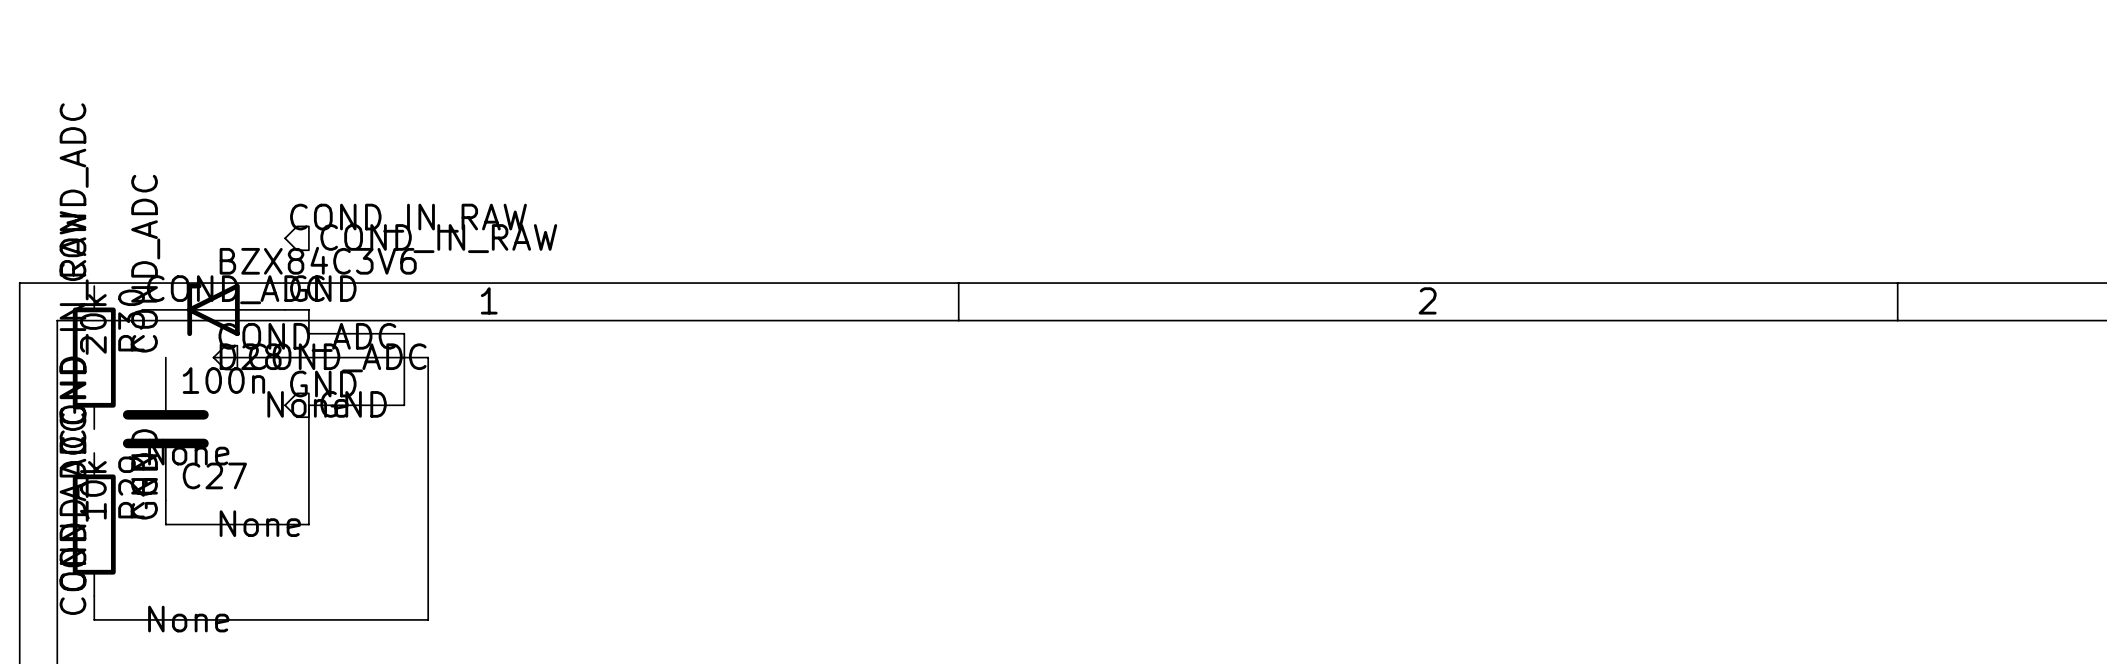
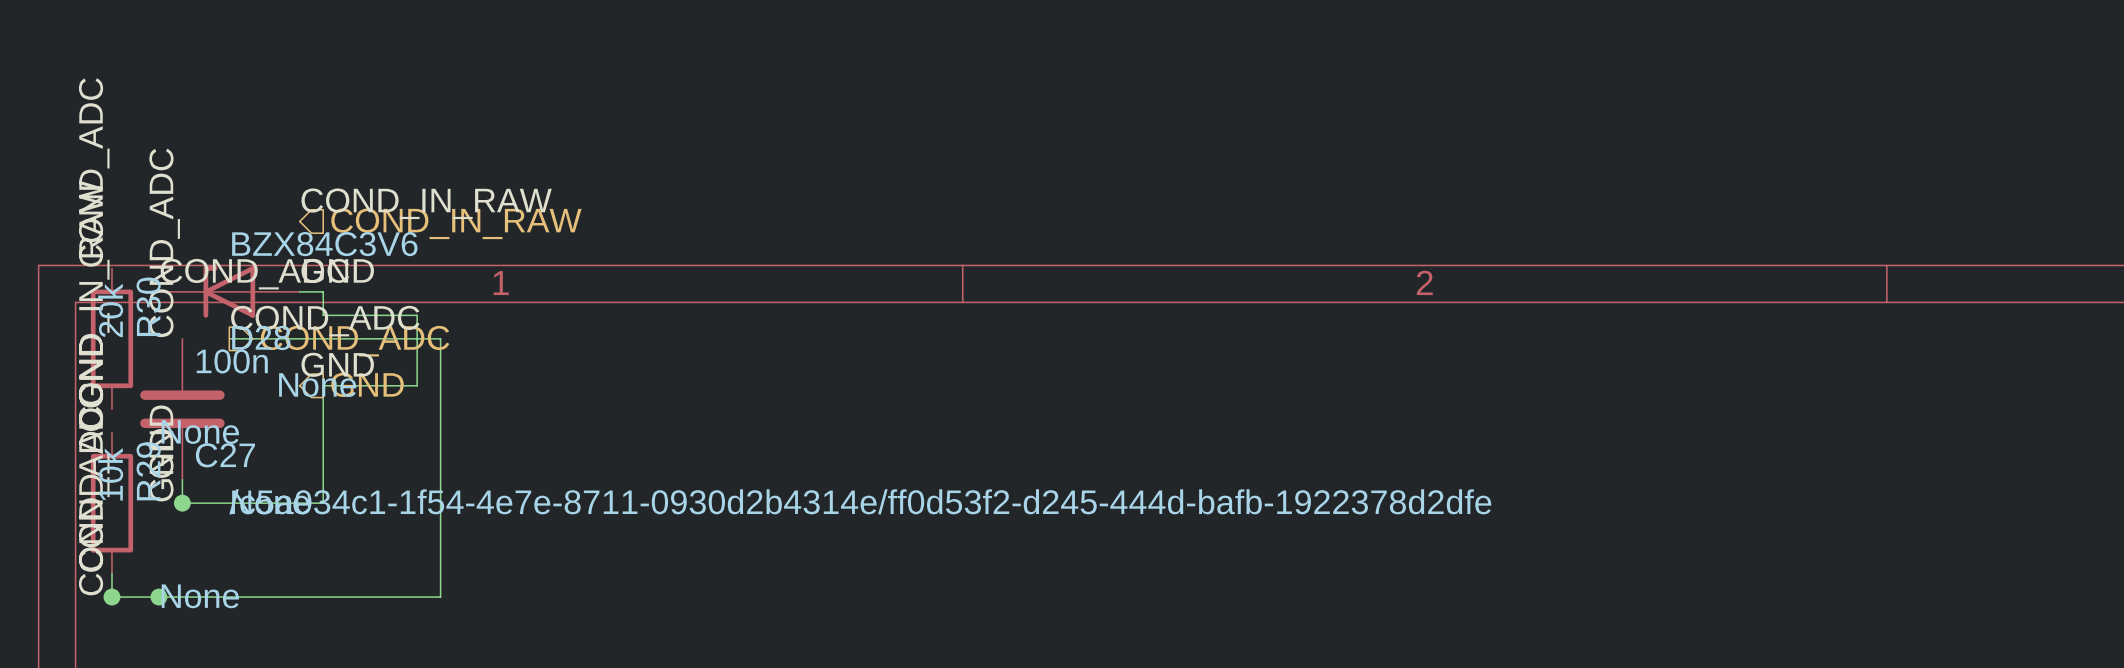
hierarchical label shape: input (337, 357) -> output (355, 341)
junction: none -> (182, 503)
C27 text: none -> /c5a034c1-1f54-4e7e-8711-0930d2b4314e/ff0d53f2-d245-444d-bafb-1922378d2dfe (860, 501)
junction: none -> (111, 597)
junction: none -> (158, 597)

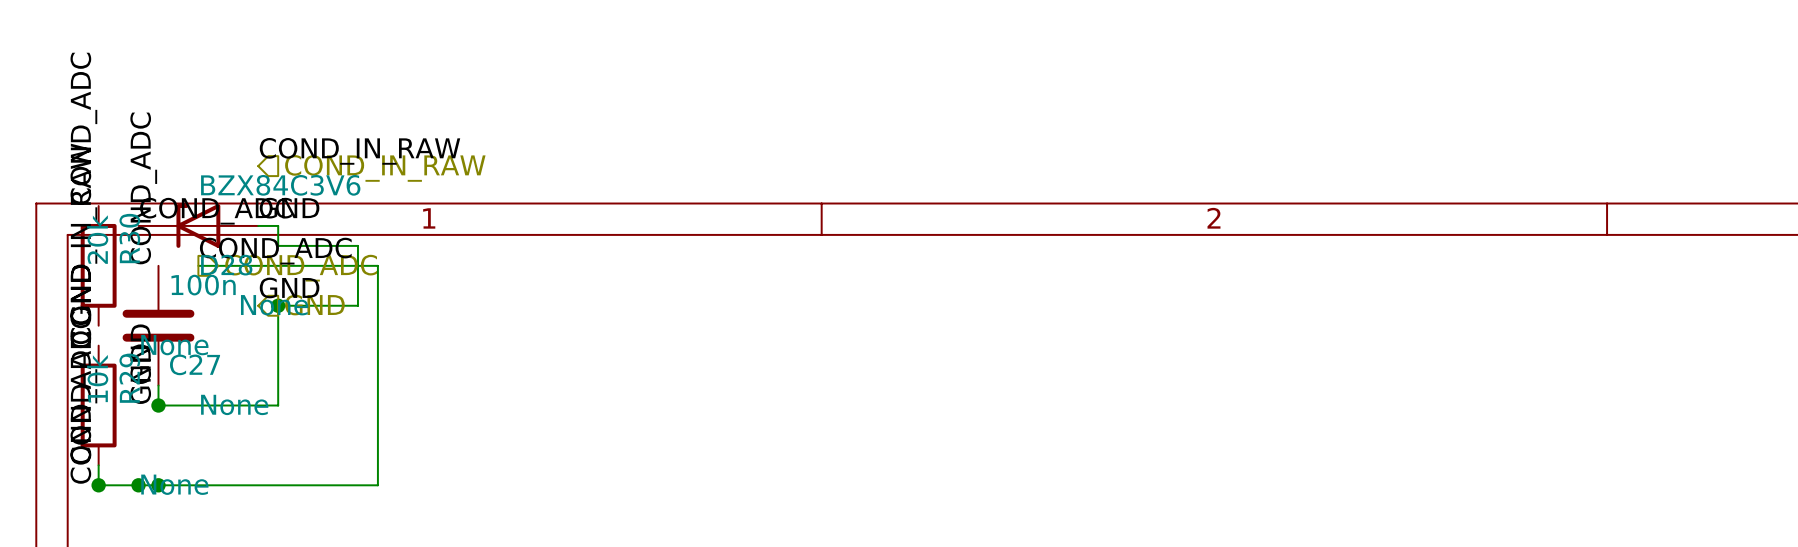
junction: none -> (278, 305)
C27 text: /c5a034c1-1f54-4e7e-8711-0930d2b4314e/ff0d53f2-d245-444d-bafb-1922378d2dfe (860, 501) -> none
junction: none -> (158, 485)

